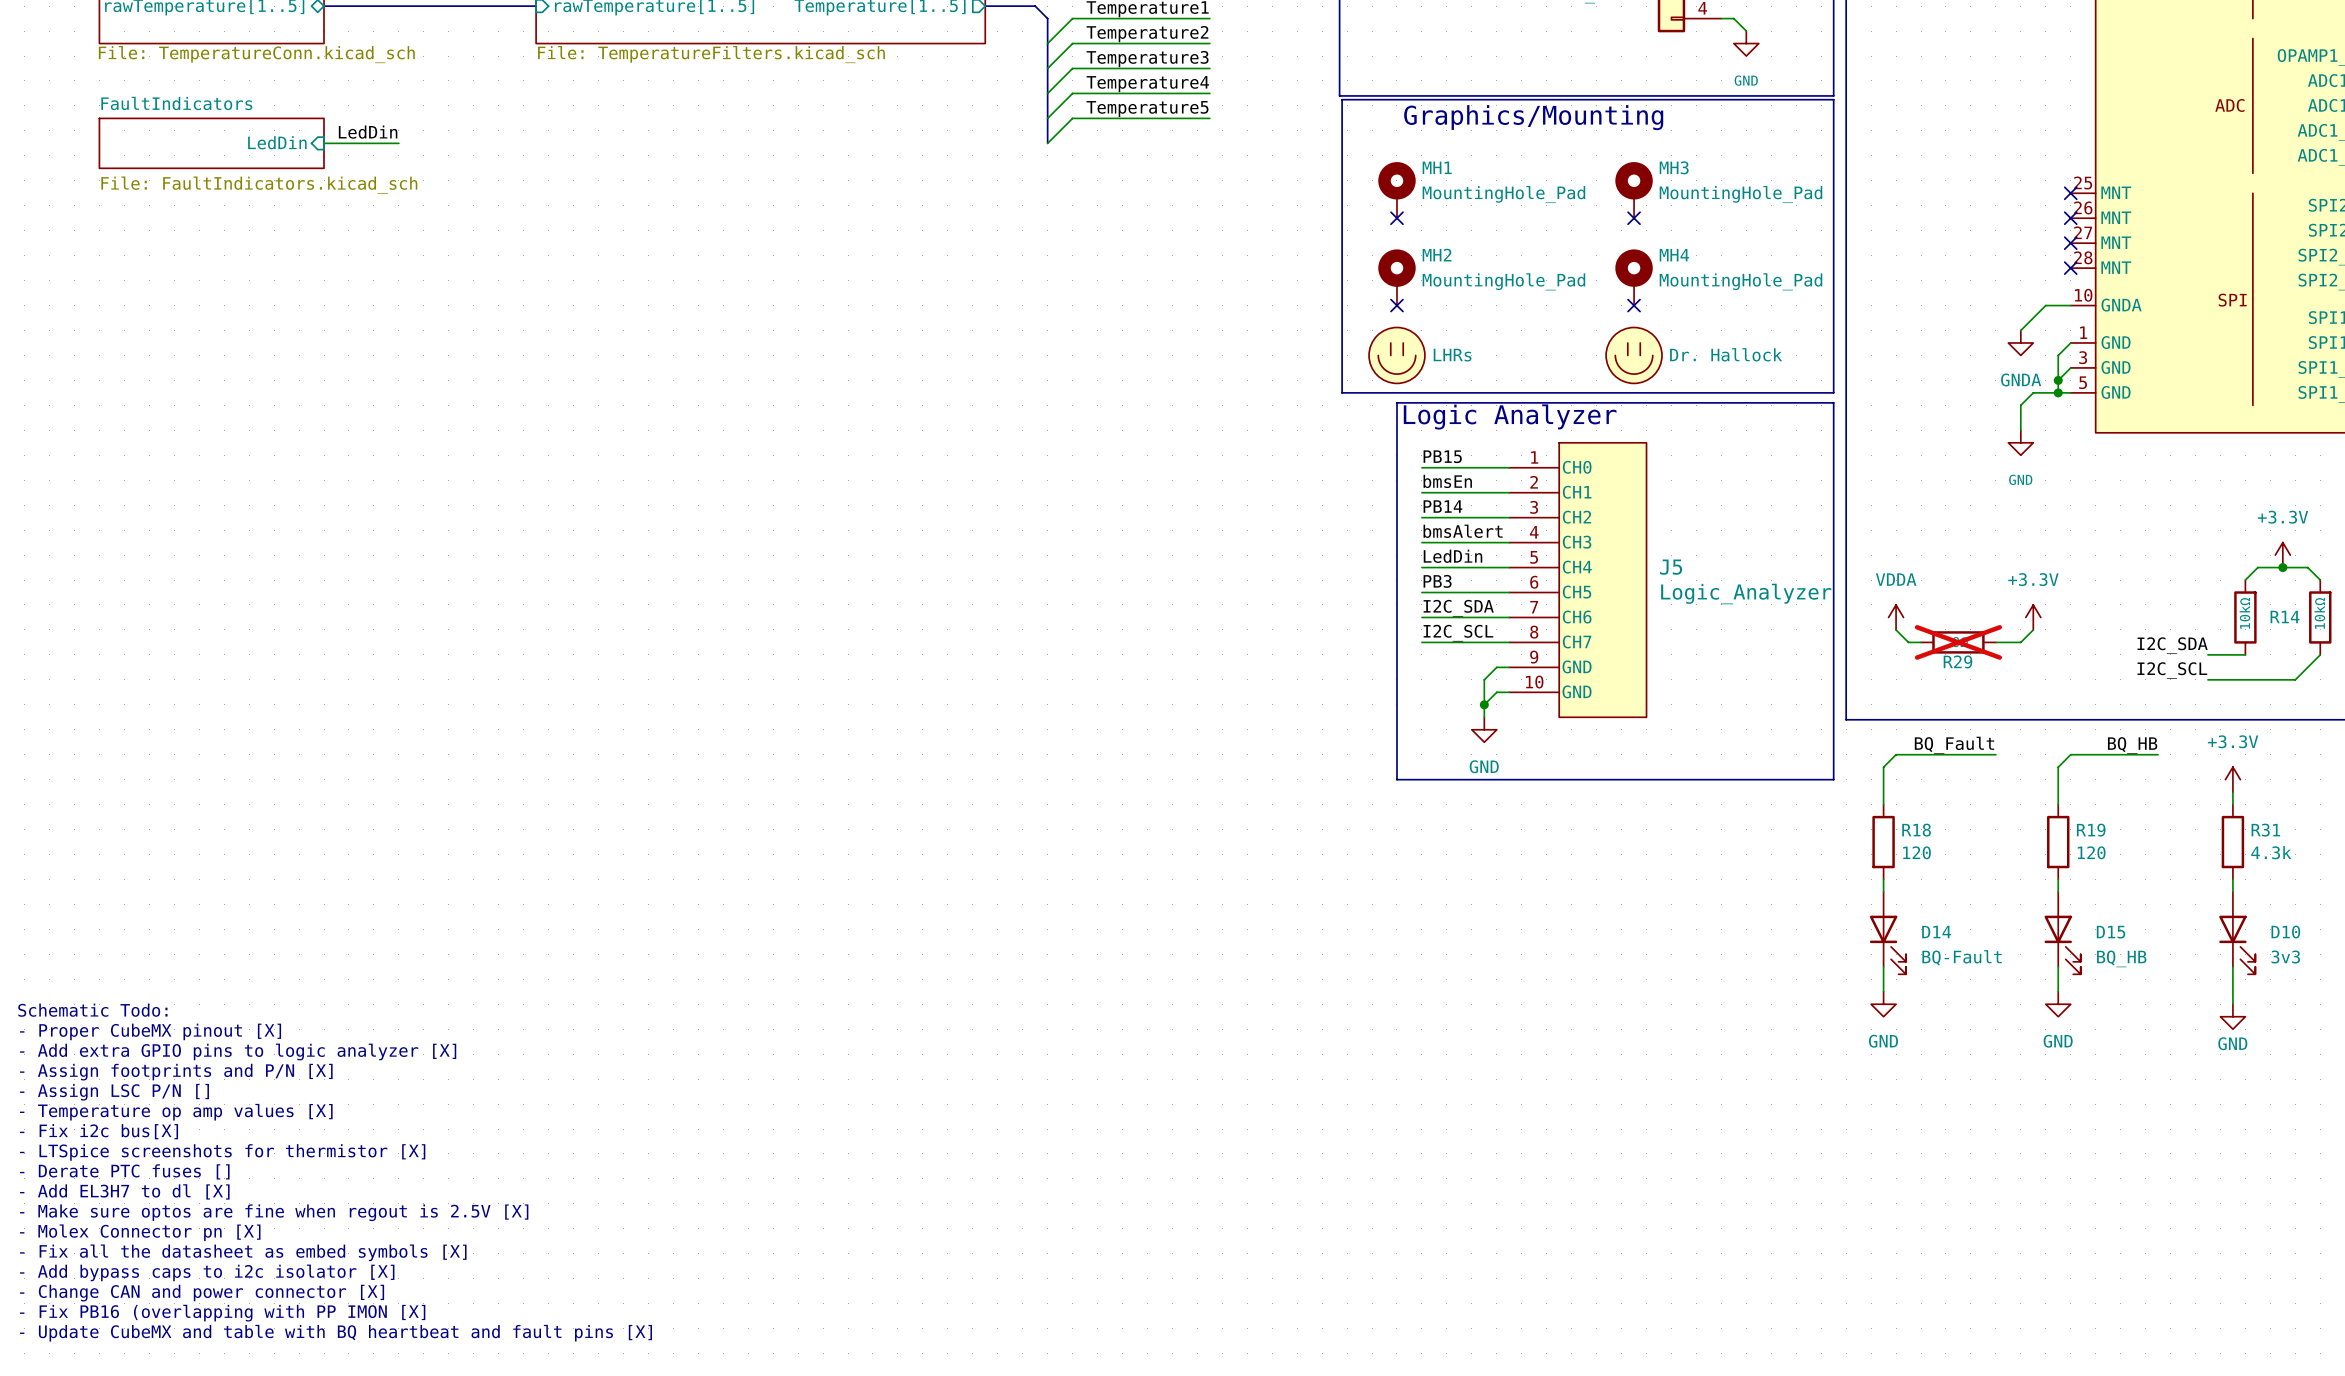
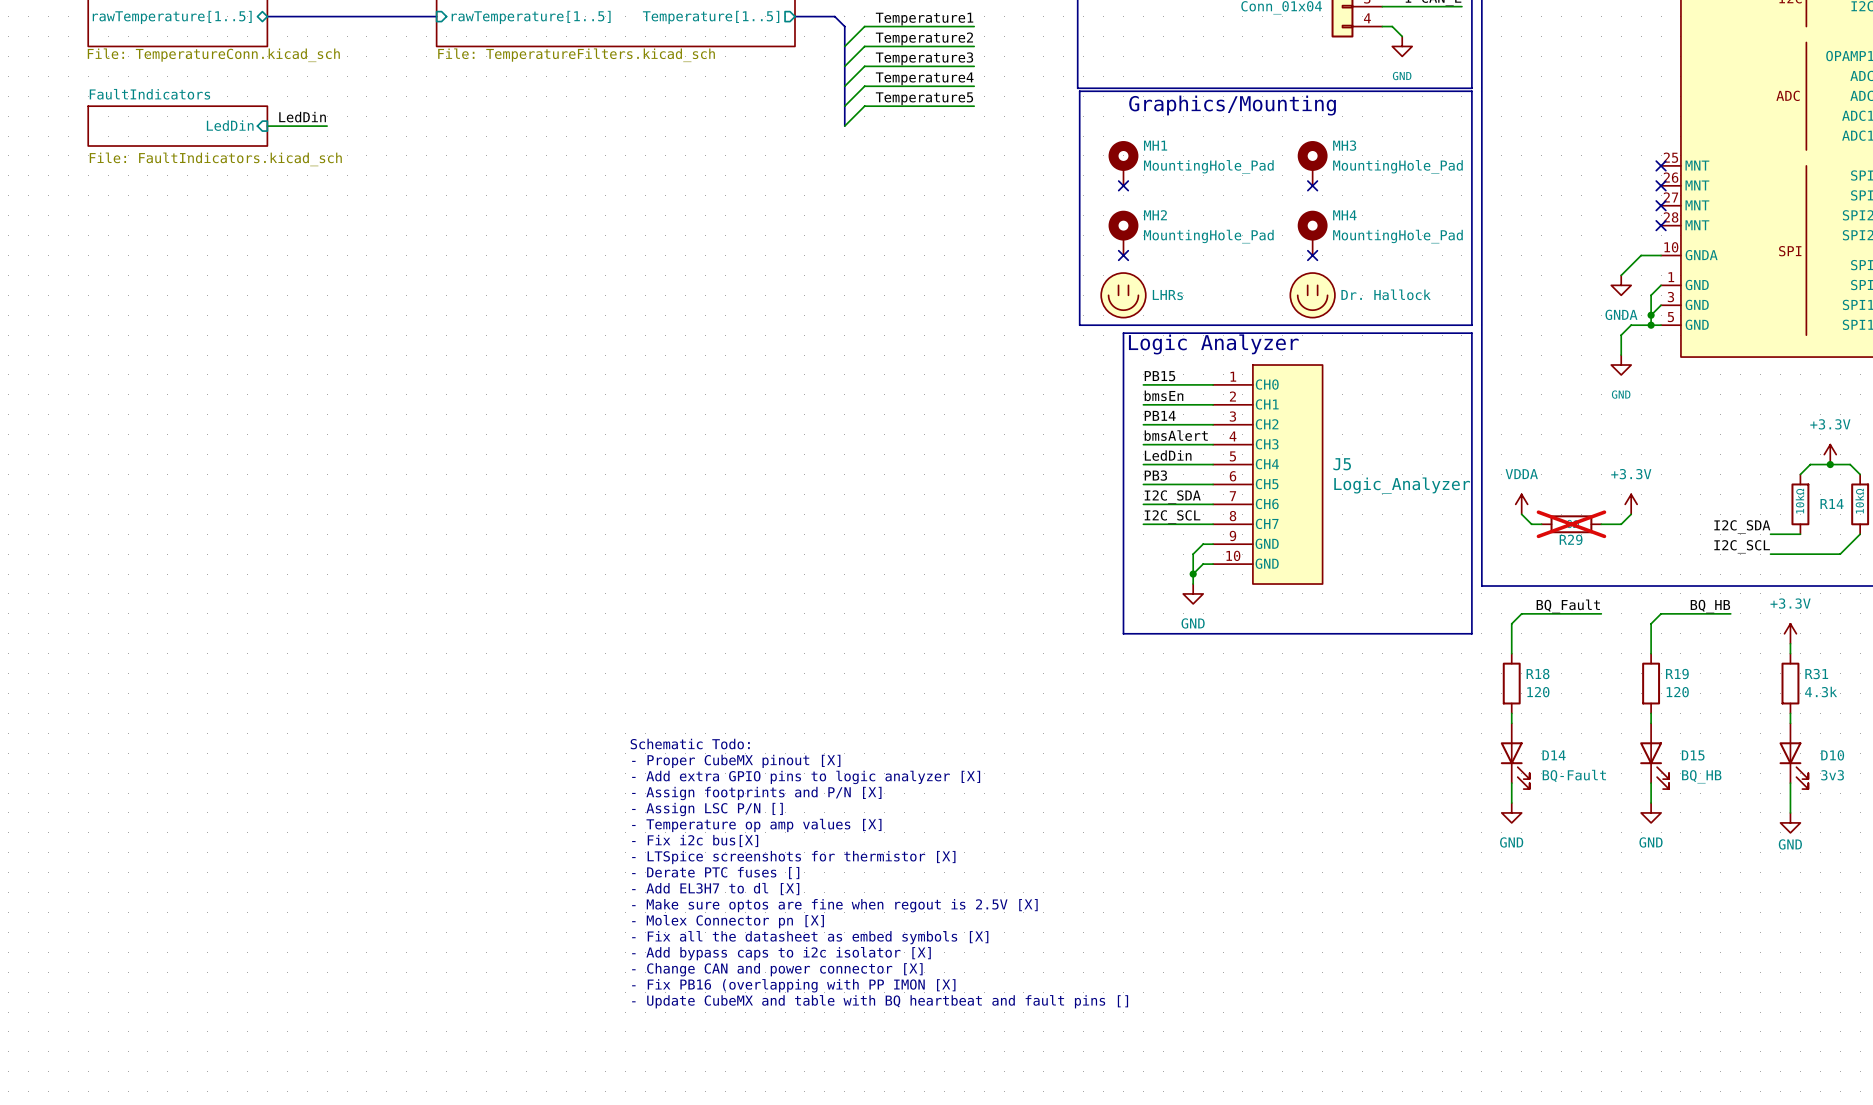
text: none -> Schematic Todo: (690, 744)
text: none -> - Proper CubeMX pinout [X] (736, 761)
text: none -> - Add extra GPIO pins to logic analyzer [X] (806, 777)
text: none -> - Assign footprints and P/N [X] (756, 793)
text: none -> - Assign LSC P/N [] (707, 809)
text: Schematic Todo: (92, 1010) -> none
text: none -> - Temperature op amp values [X] (756, 825)
text: - Proper CubeMX pinout [X] (150, 1031) -> none
text: none -> - Fix i2c bus[X] (695, 840)
text: - Add extra GPIO pins to logic analyzer [X] (238, 1052) -> none
text: none -> - LTSpice screenshots for thermistor [X] (793, 857)
text: - Assign footprints and P/N [X] (176, 1072) -> none
text: none -> - Derate PTC fuses [] (715, 873)
text: - Assign LSC P/N [] (114, 1092) -> none
text: none -> - Add EL3H7 to dl [X] (715, 889)
text: - Temperature op amp values [X] (176, 1112) -> none
text: none -> - Make sure optos are fine when regout is 2.5V [X] (834, 905)
text: - Fix i2c bus[X] (99, 1131) -> none
text: none -> - Molex Connector pn [X] (728, 921)
text: - LTSpice screenshots for thermistor [X] (222, 1152) -> none
text: none -> - Fix all the datasheet as embed symbols [X] (810, 937)
text: - Derate PTC fuses [] (124, 1171) -> none
text: none -> - Add bypass caps to i2c isolator [X] (781, 953)
text: - Add EL3H7 to dl [X] (124, 1191) -> none
text: none -> - Change CAN and power connector [X] (777, 969)
text: - Make sure optos are fine when regout is 2.5V [X] (274, 1212) -> none
text: none -> - Fix PB16 (overlapping with PP IMON [X] (793, 985)
text: - Molex Connector pn [X] (140, 1232) -> none
text: none -> - Update CubeMX and table with BQ heartbeat and fault pins [] (880, 1001)
text: - Fix all the datasheet as embed symbols [X] (243, 1252) -> none
text: - Add bypass caps to i2c isolator [X] (207, 1272) -> none
text: - Change CAN and power connector [X] (202, 1293) -> none
text: - Fix PB16 (overlapping with PP IMON [X] (222, 1313) -> none
text: - Update CubeMX and table with BQ heartbeat and fault pins [X] (336, 1333) -> none

